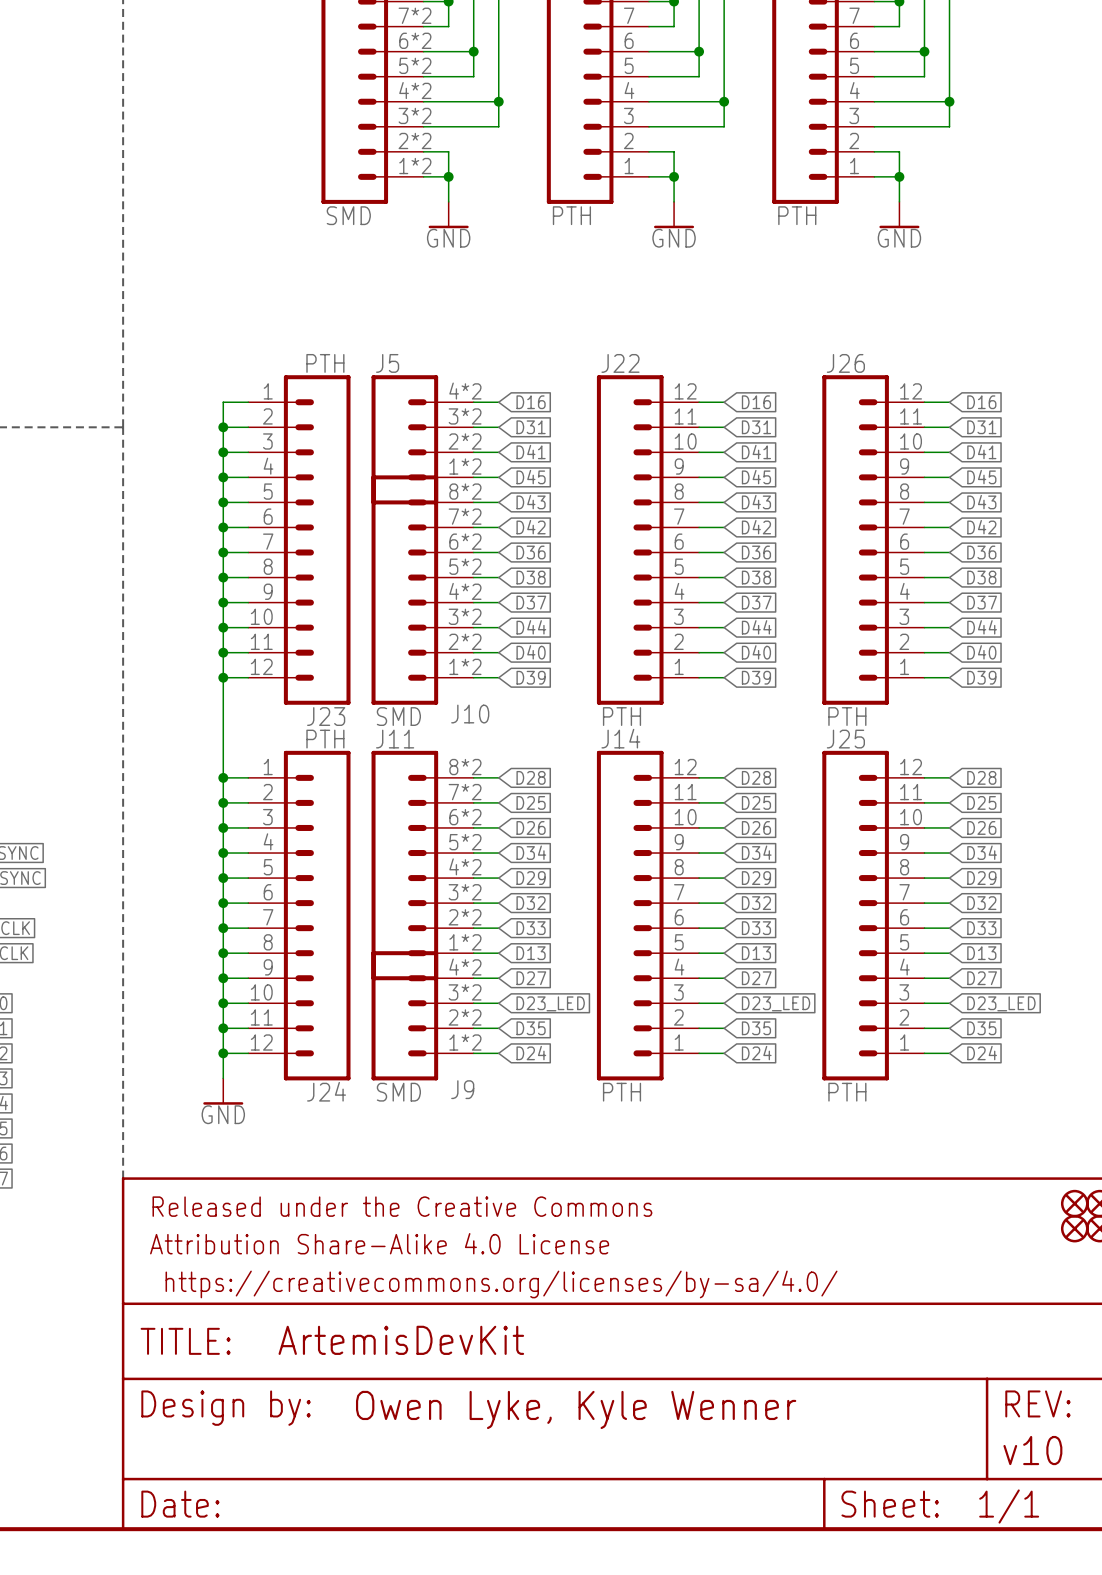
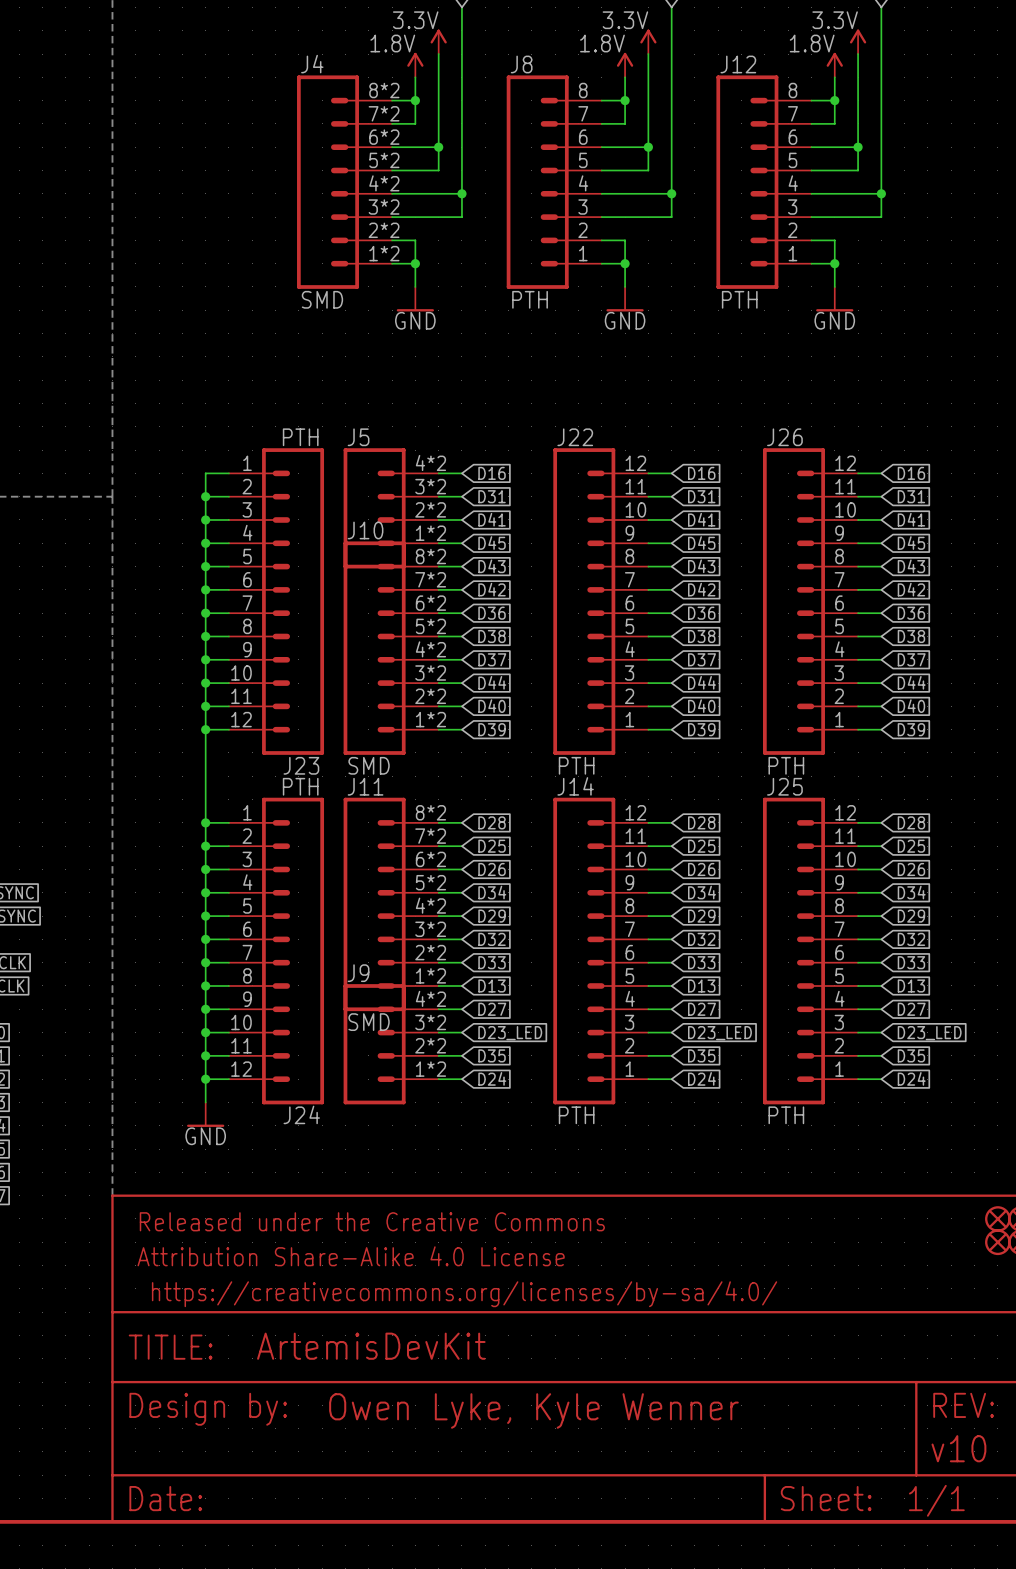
J10 name position: J10 (470, 714) -> J10 (365, 530)
J9 name position: J9 (462, 1089) -> J9 (358, 973)
J11 value position: SMD (398, 1092) -> SMD (369, 1022)

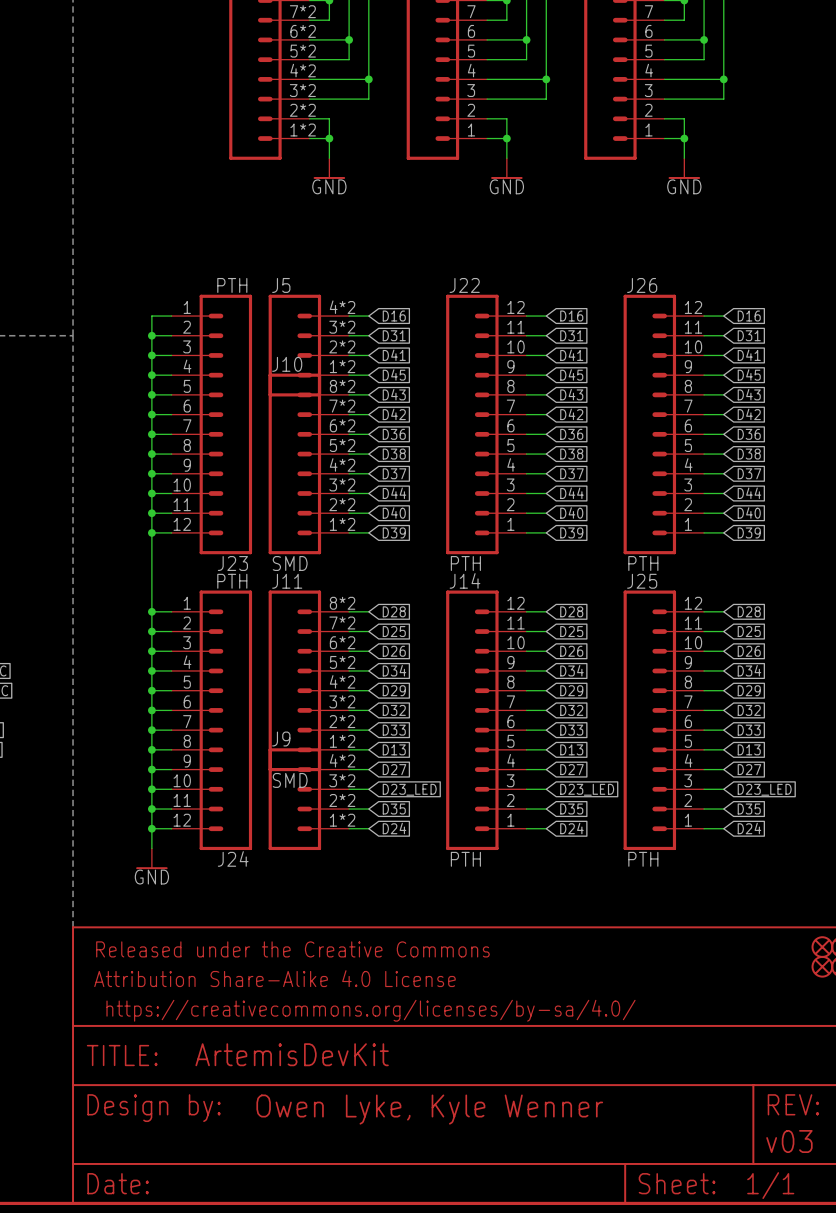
J4 value: SMD (322, 299) -> none
J8 value: PTH (530, 299) -> none
J12 value: PTH (739, 299) -> none
part text: v10 (958, 1448) -> v03 (789, 1141)

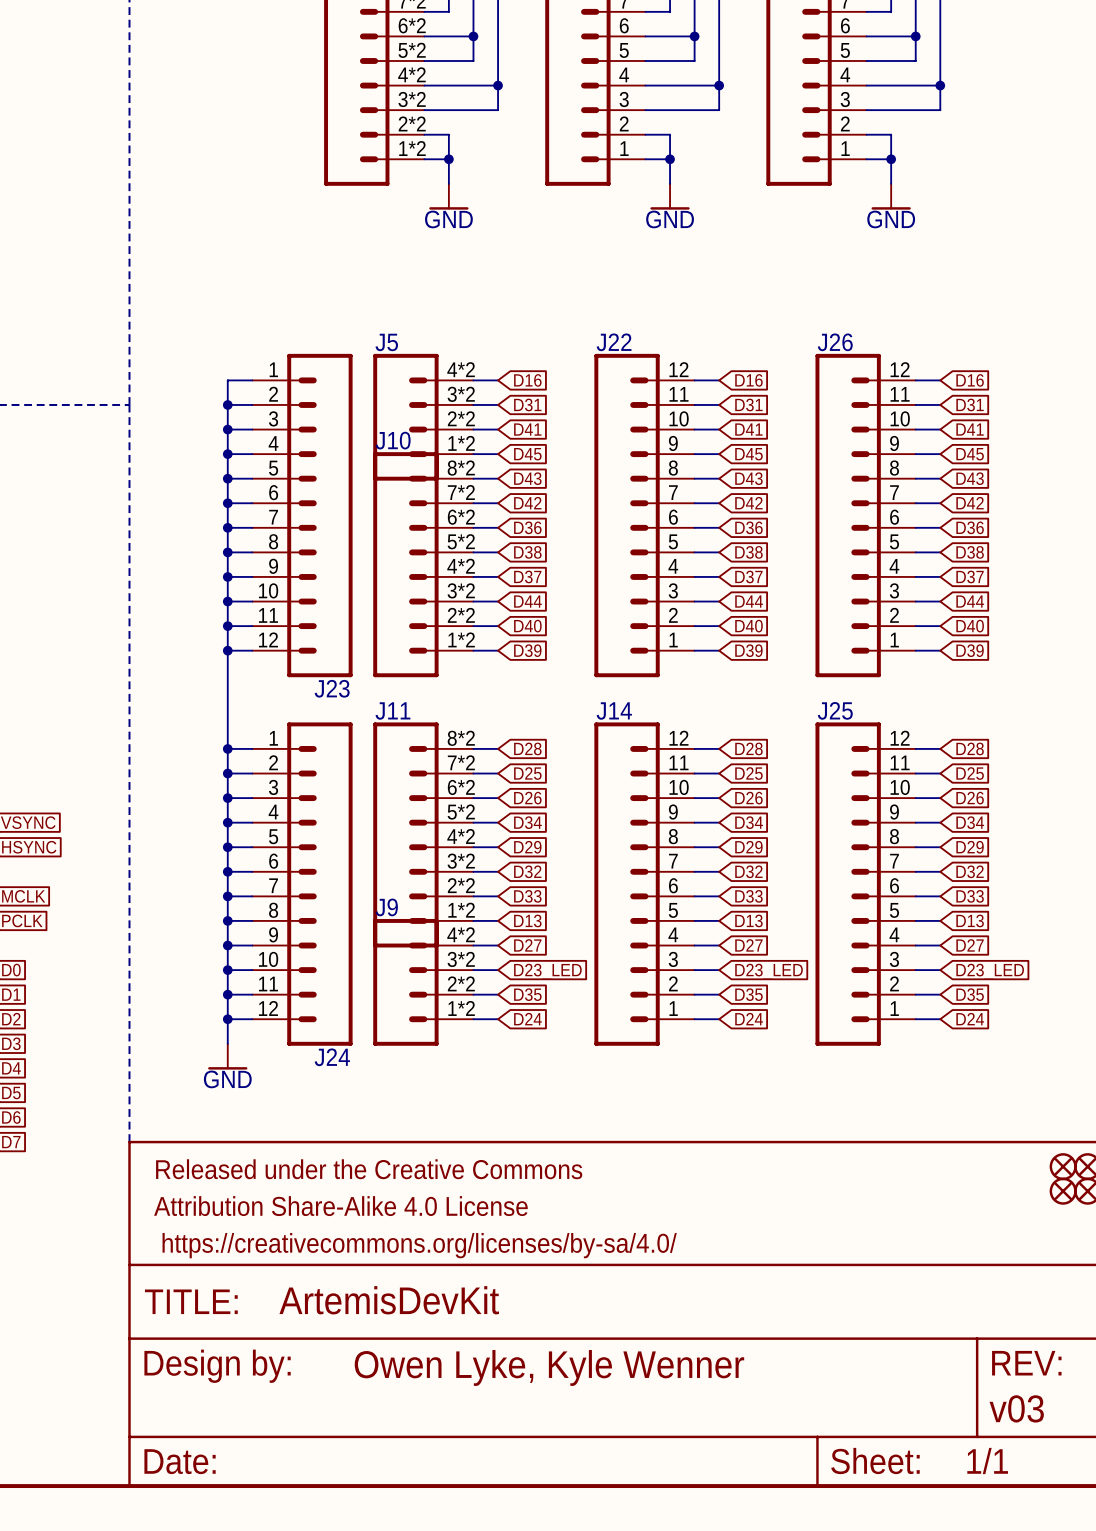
J23 value: PTH (232, 285) -> none
J10 value: SMD (290, 563) -> none
J22 value: PTH (465, 563) -> none
J26 value: PTH (643, 563) -> none
J24 value: PTH (232, 581) -> none
J11 value: SMD (290, 780) -> none
J14 value: PTH (465, 859) -> none
J25 value: PTH (643, 859) -> none

